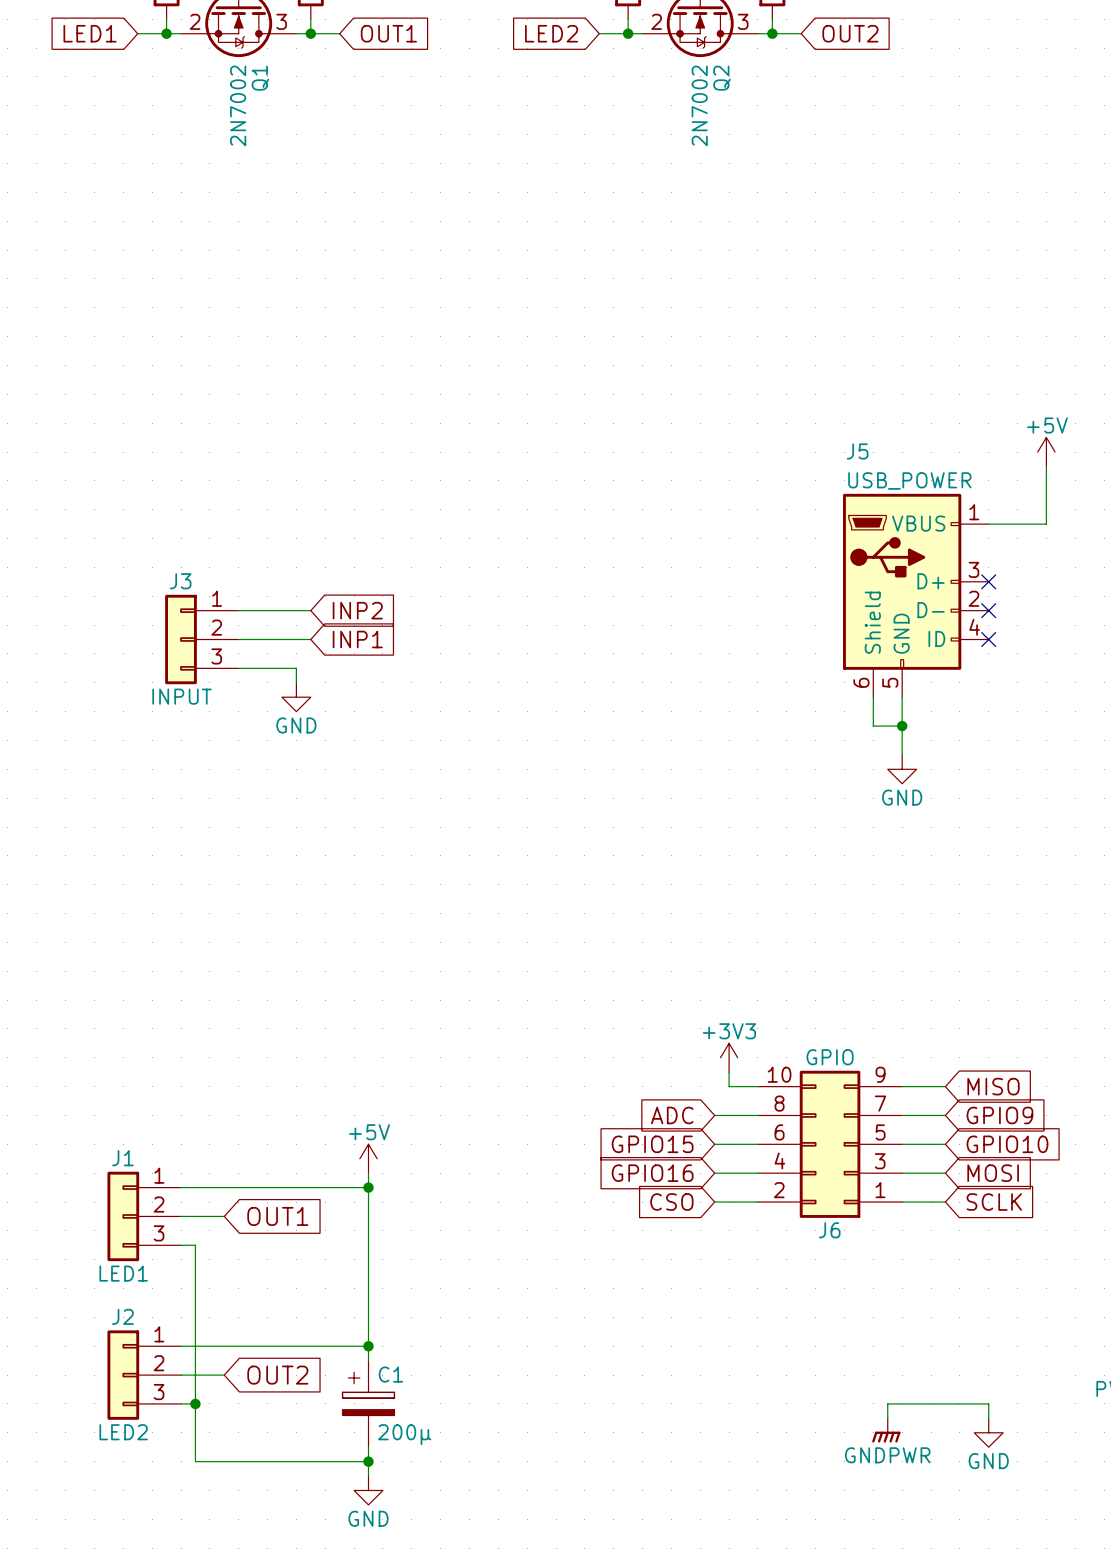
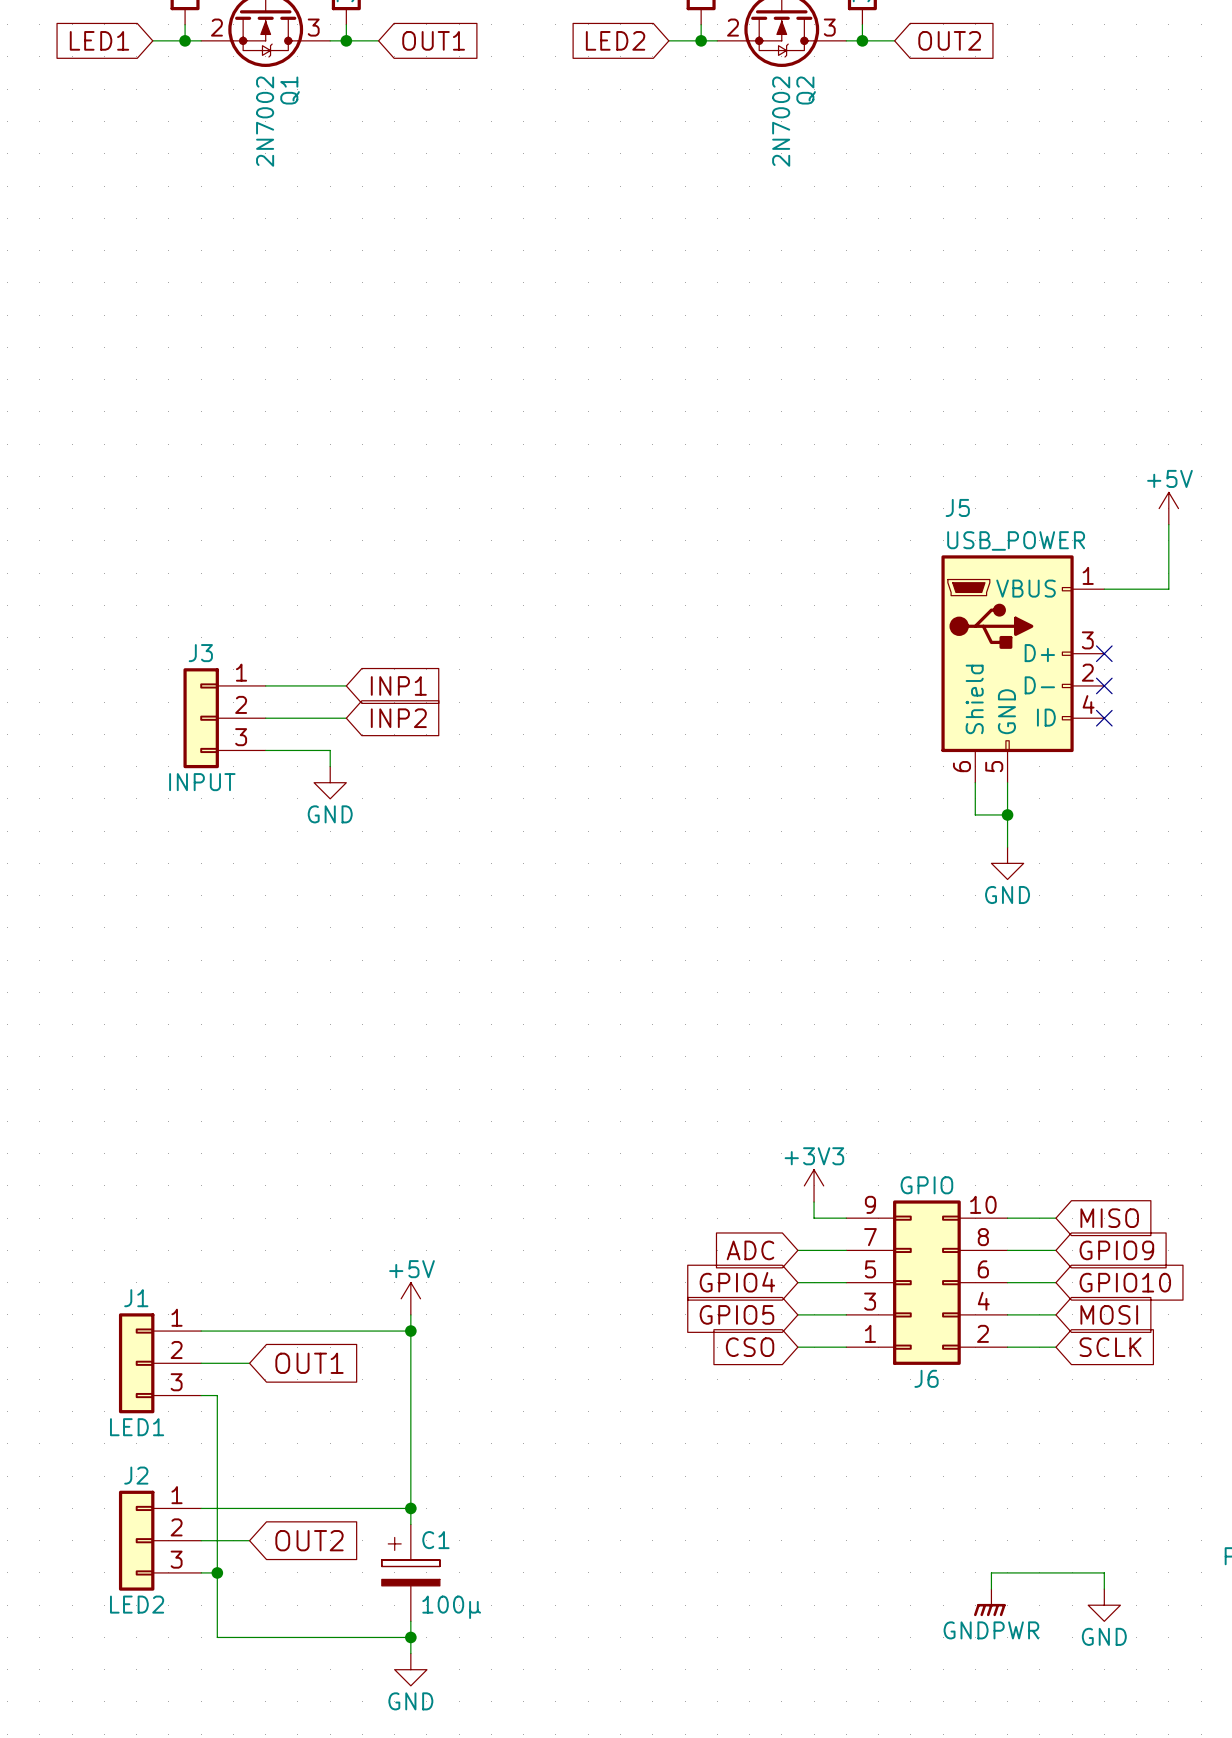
global label: INP2 (357, 610) -> INP1 (398, 685)
global label: INP1 (357, 639) -> INP2 (398, 718)
global label: GPIO15 (652, 1144) -> GPIO4 (737, 1282)
J6 flip: as is (830, 1144) -> left-right (926, 1282)
global label: GPIO16 (652, 1173) -> GPIO5 (736, 1314)
C1 value: 200µ (404, 1434) -> 100µ (451, 1607)

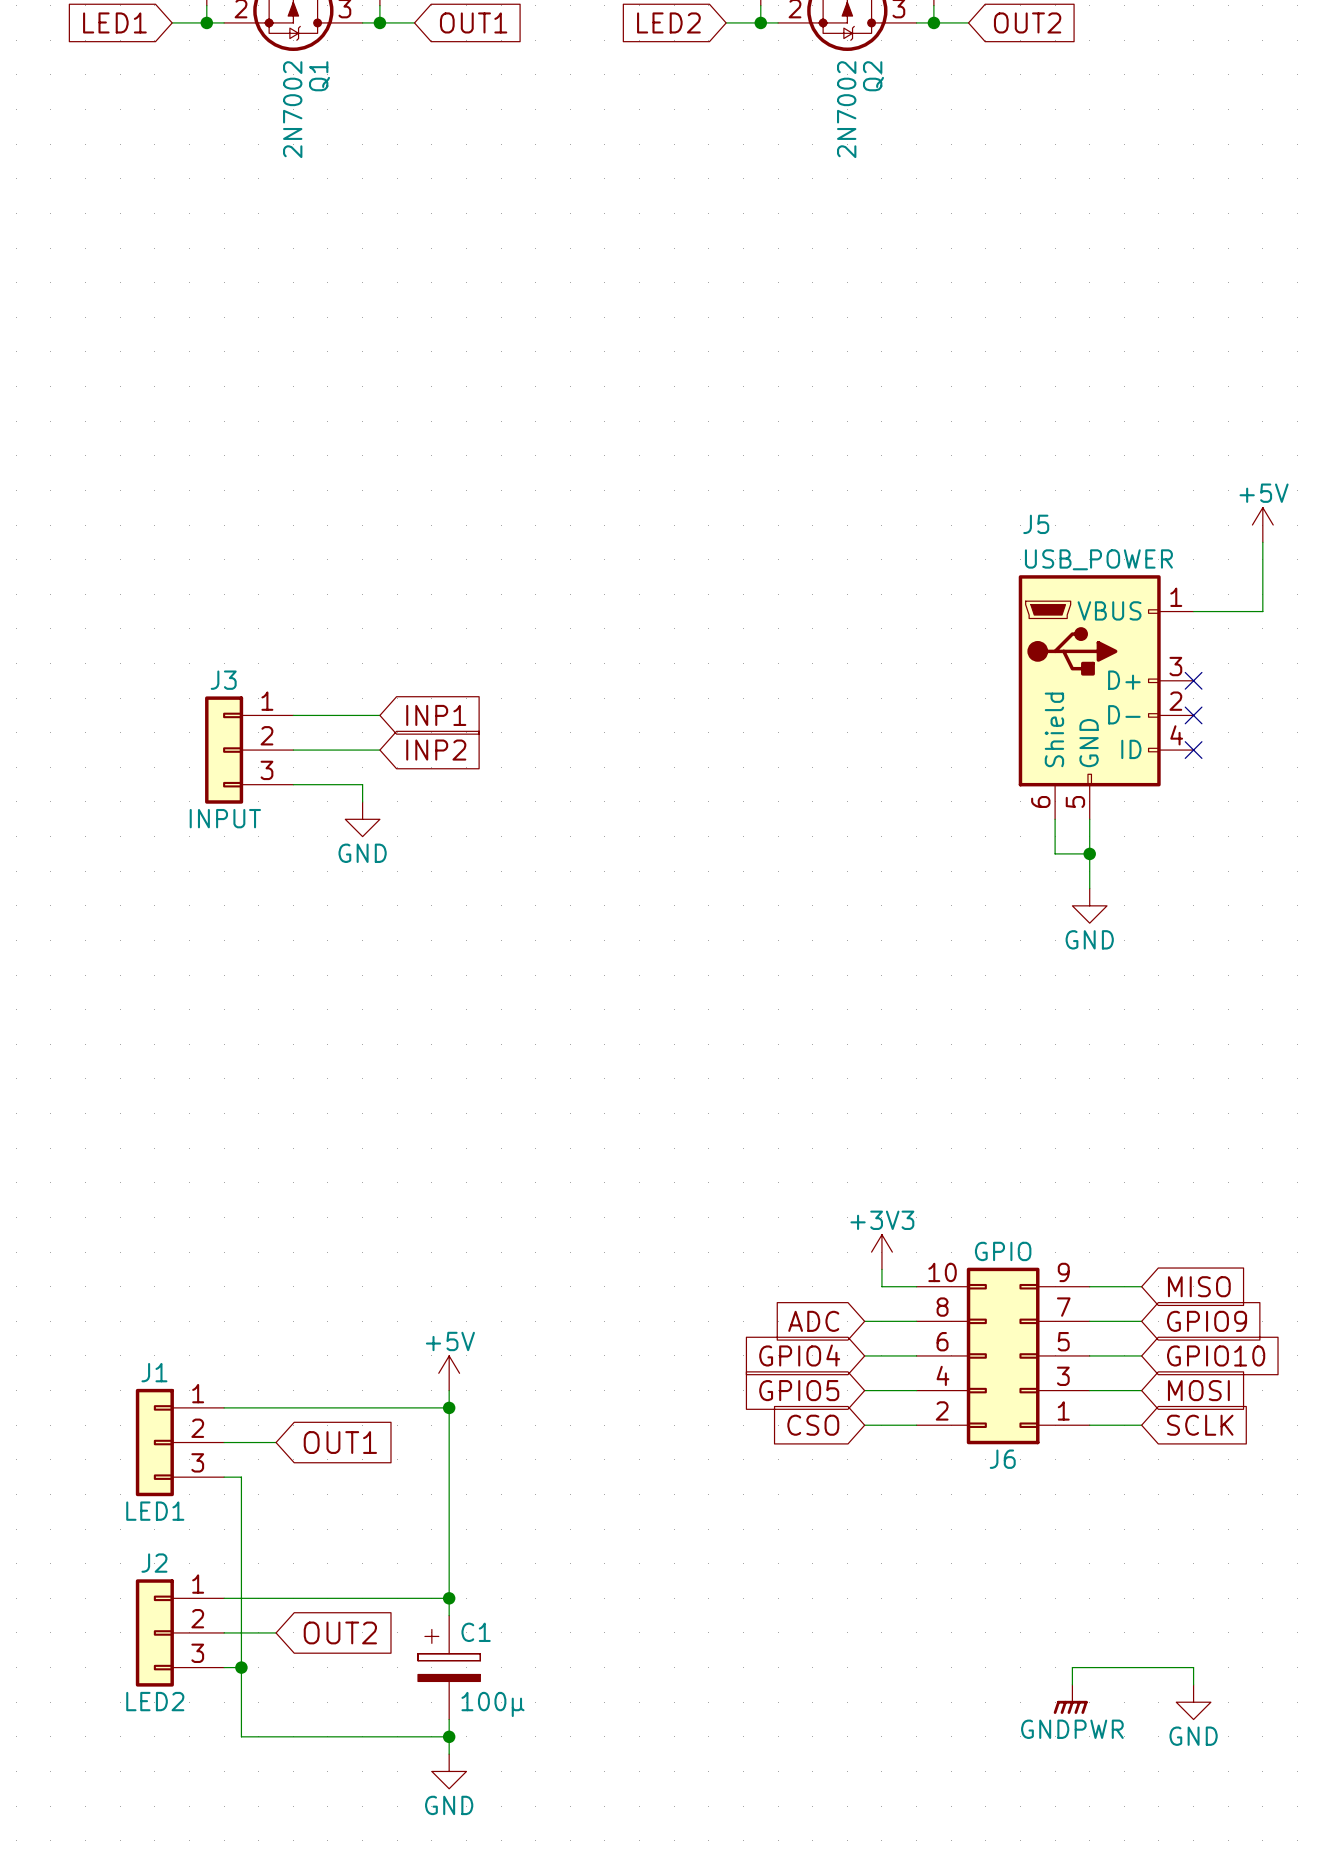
J6 flip: as is (926, 1282) -> left-right (1003, 1355)

